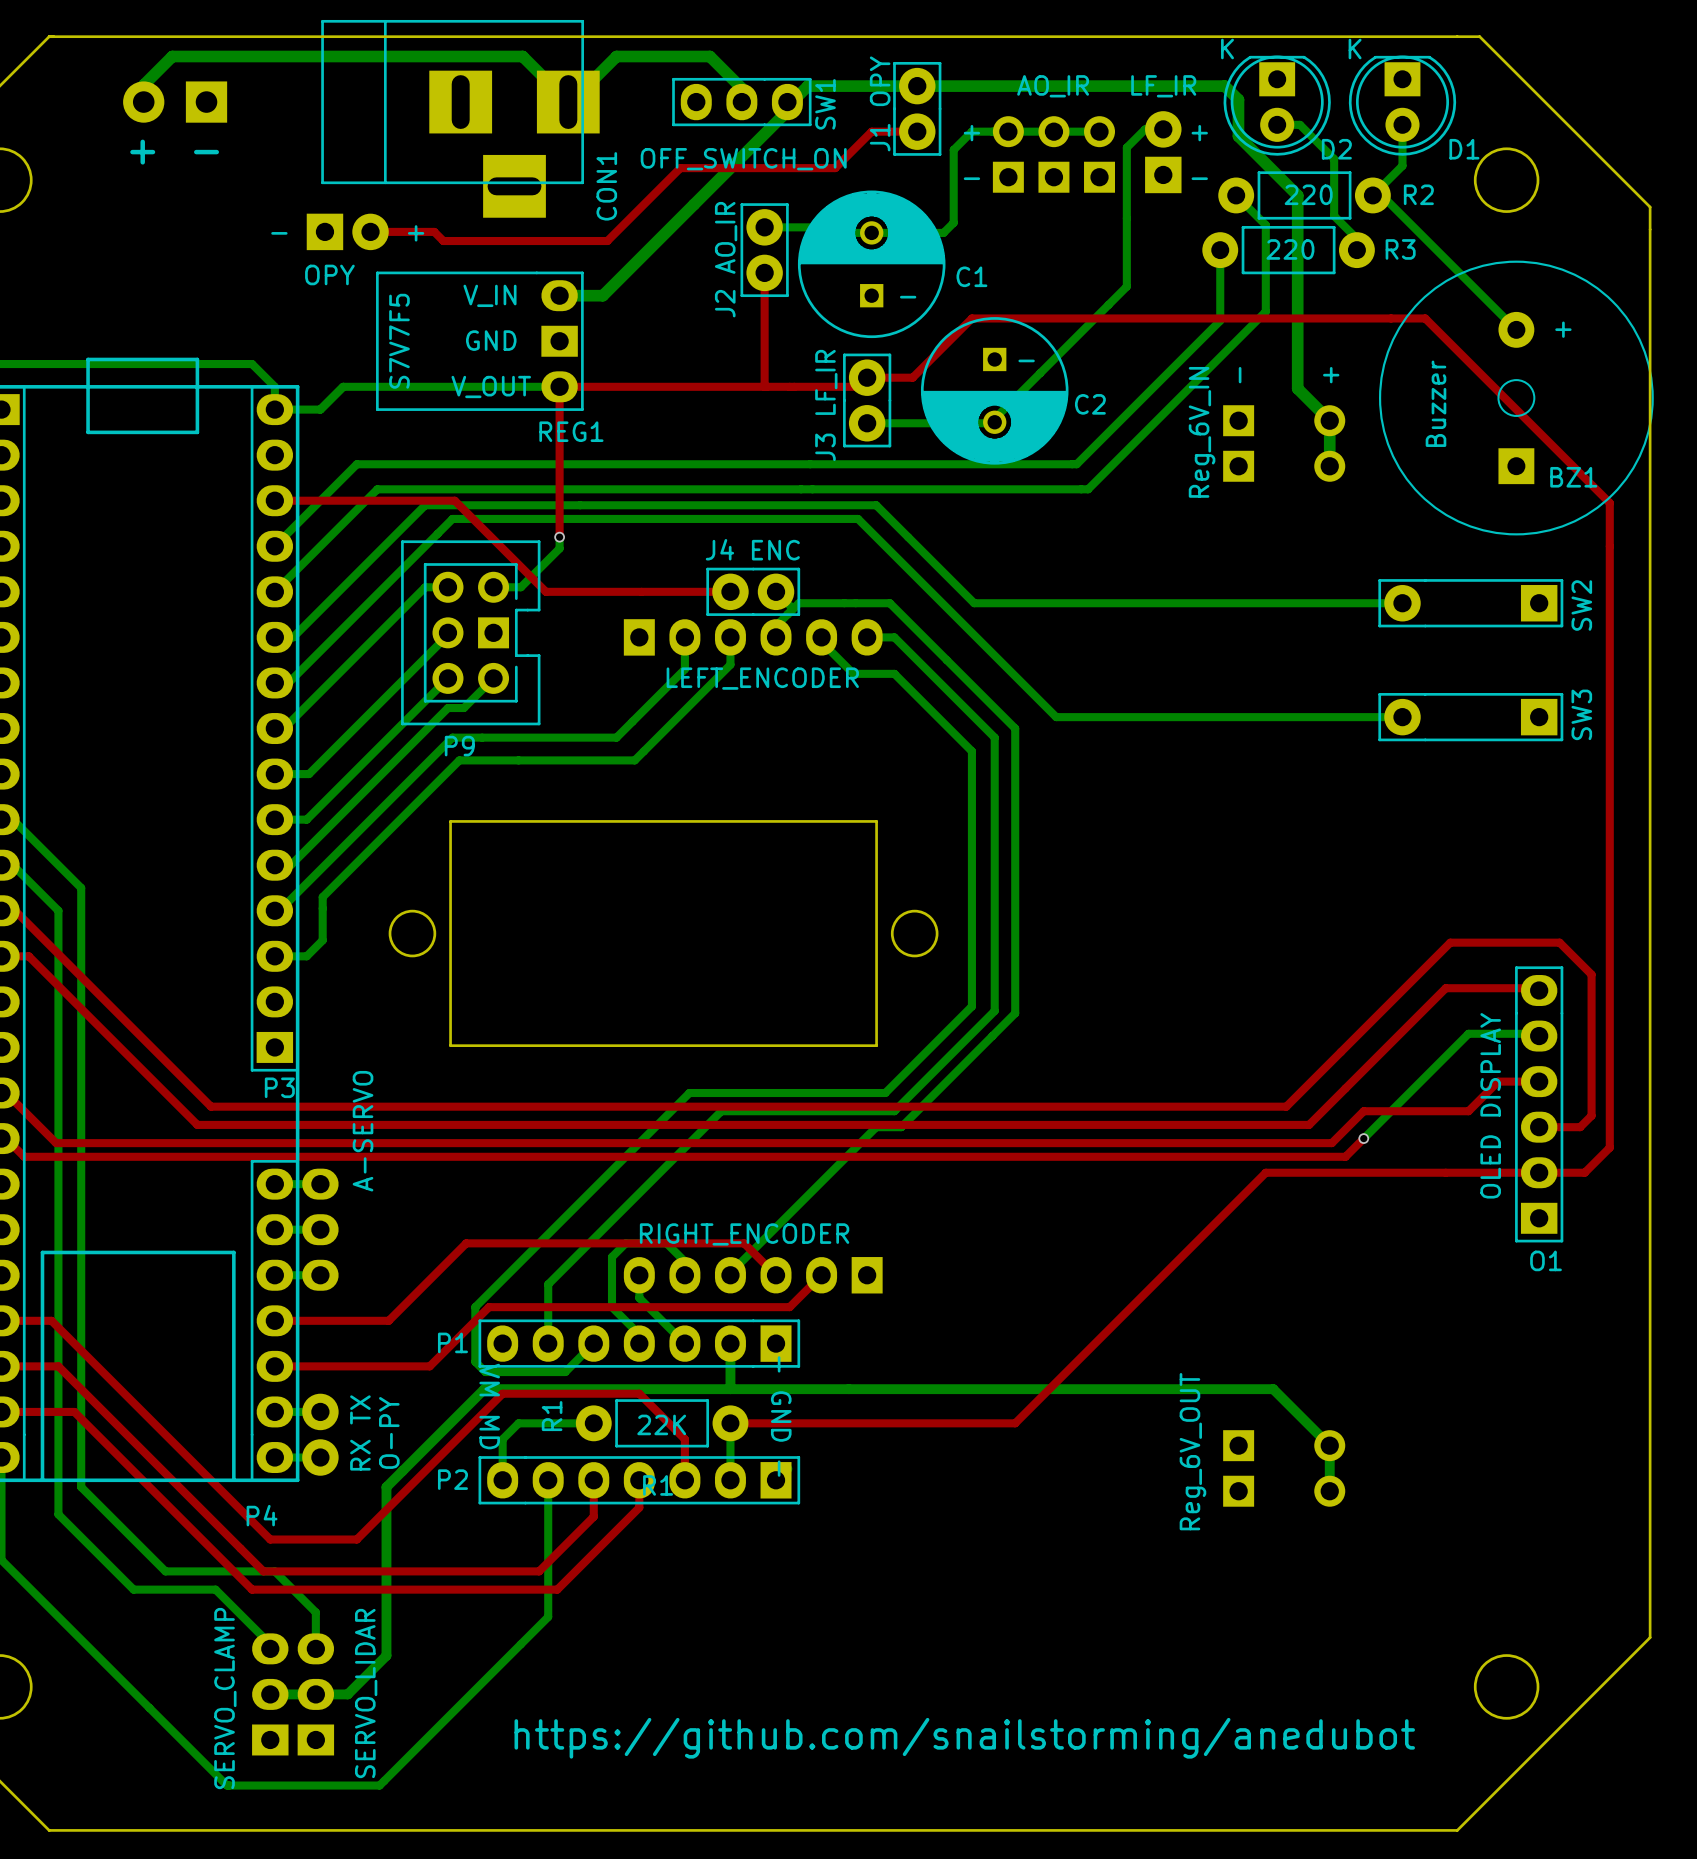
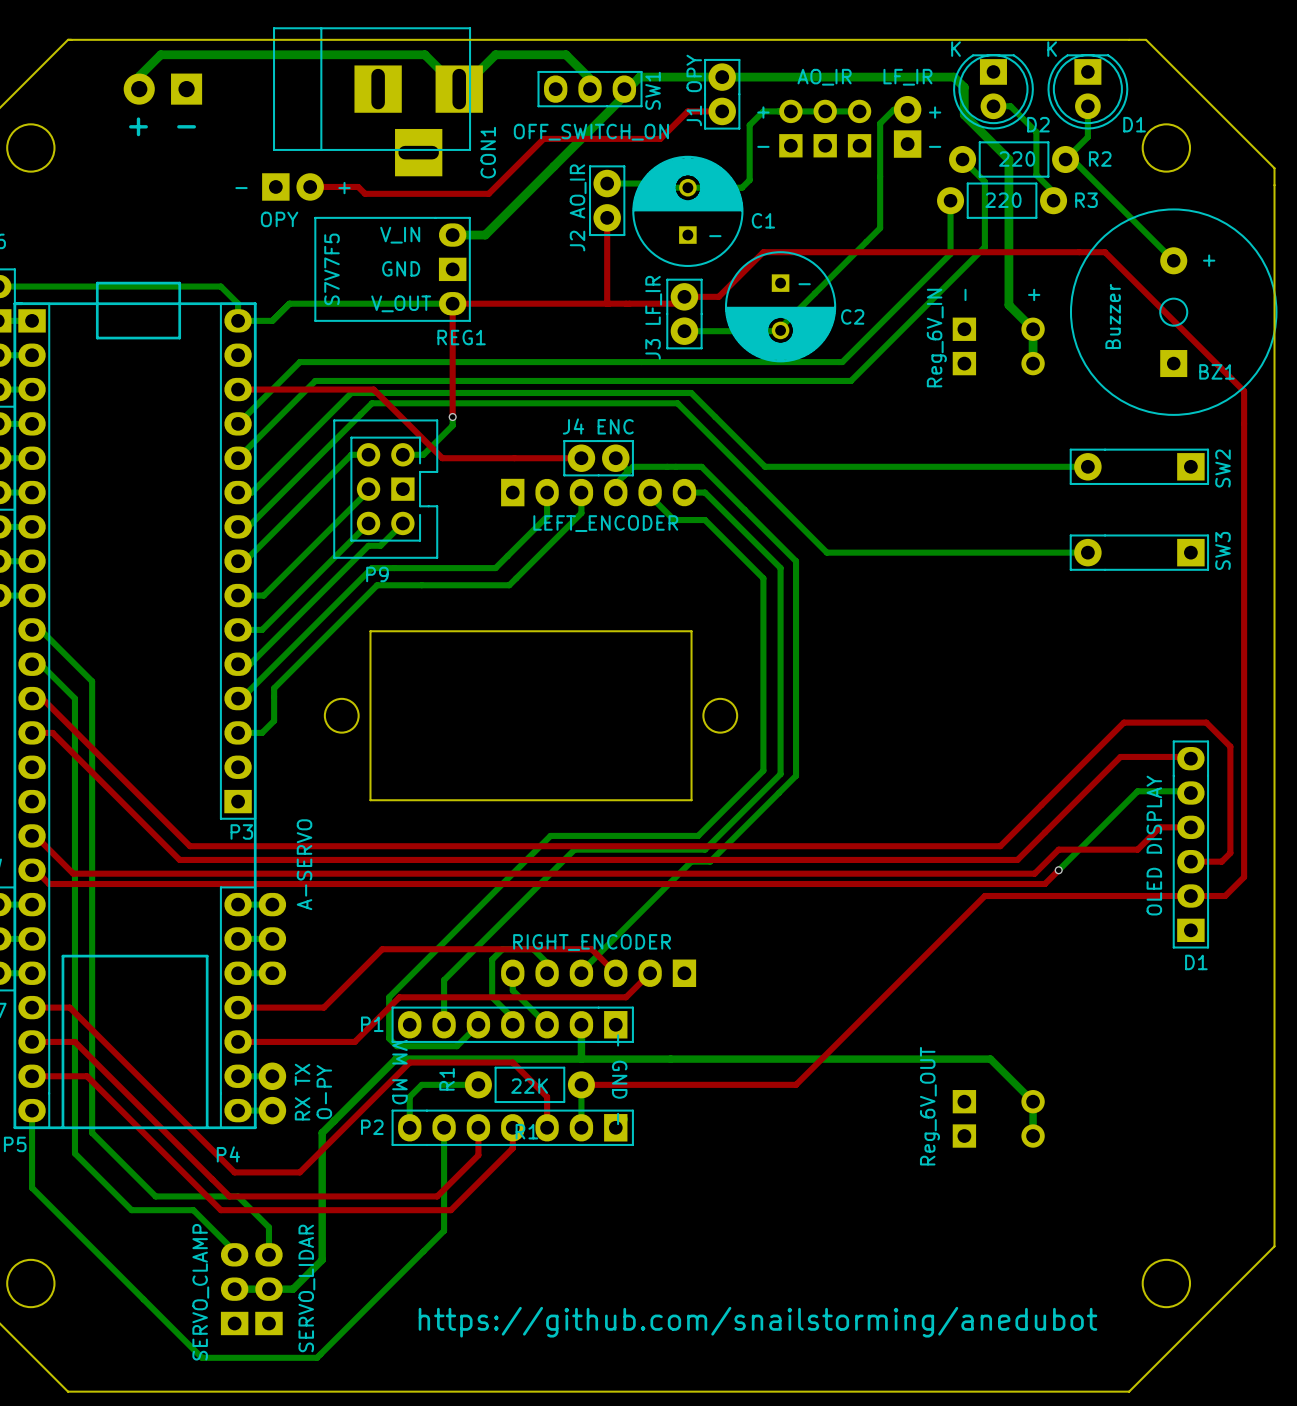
O1 name: O1 (1546, 1260) -> D1 (1196, 962)

